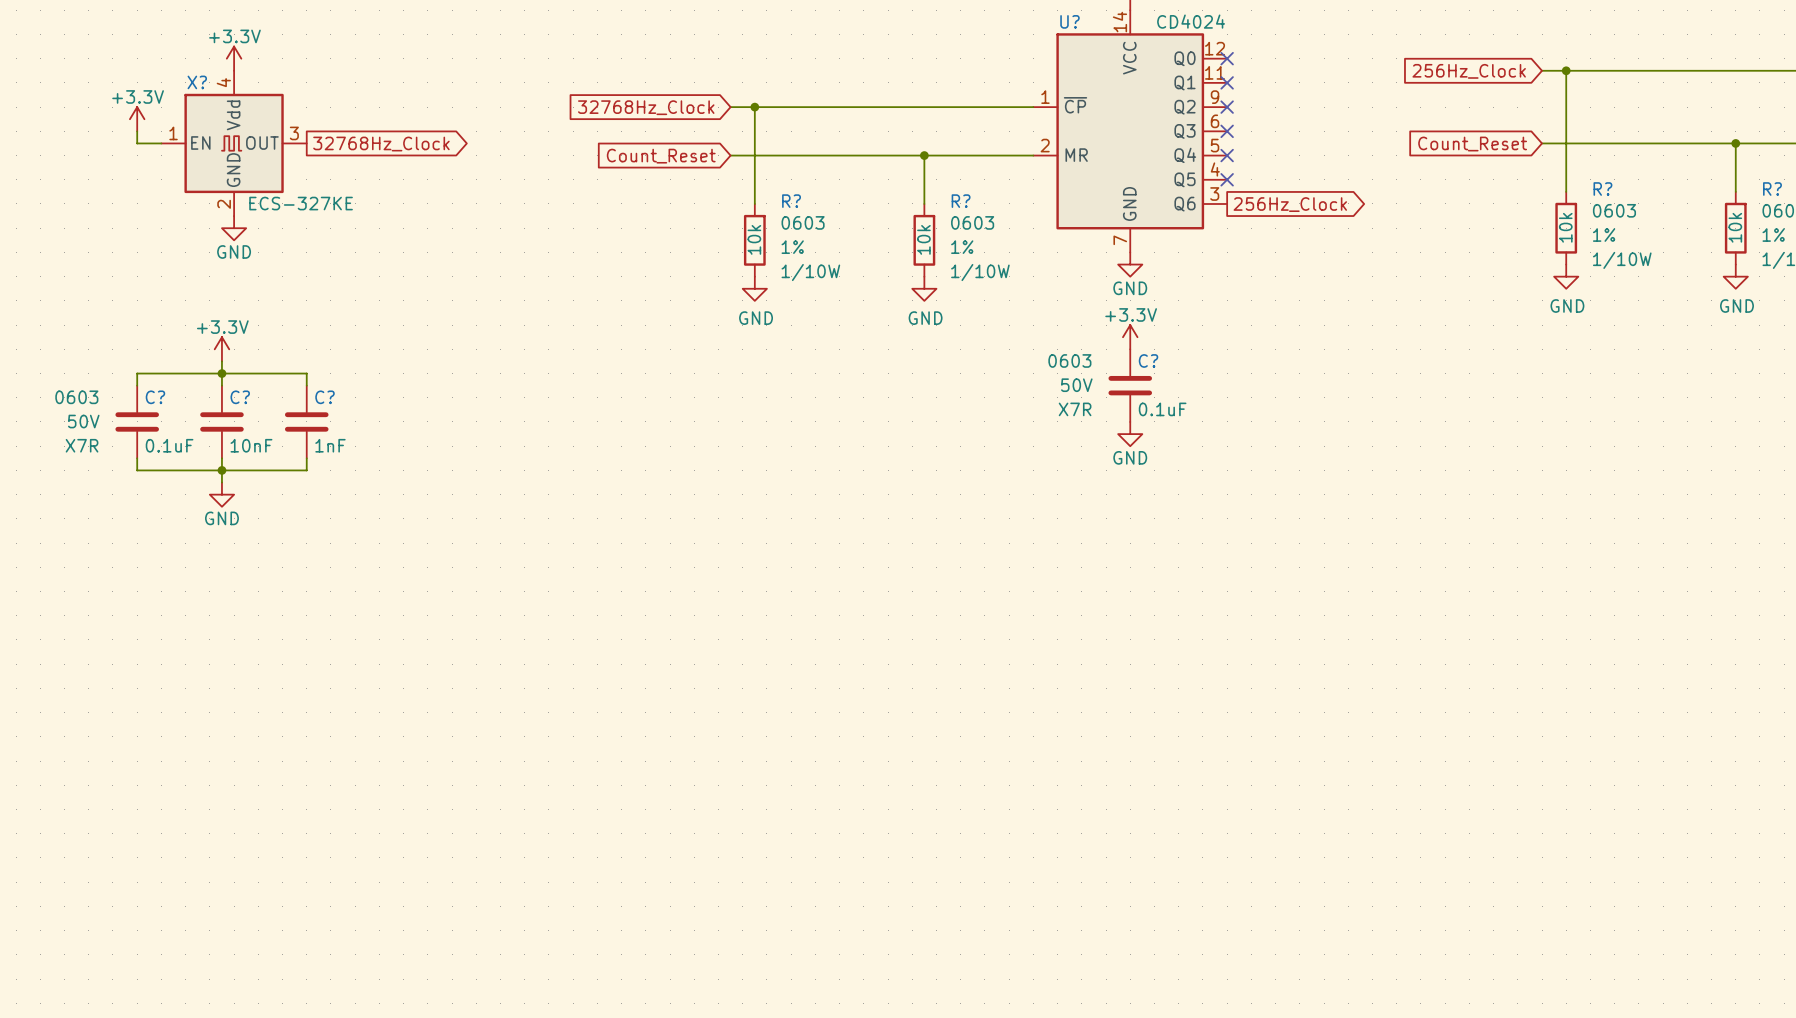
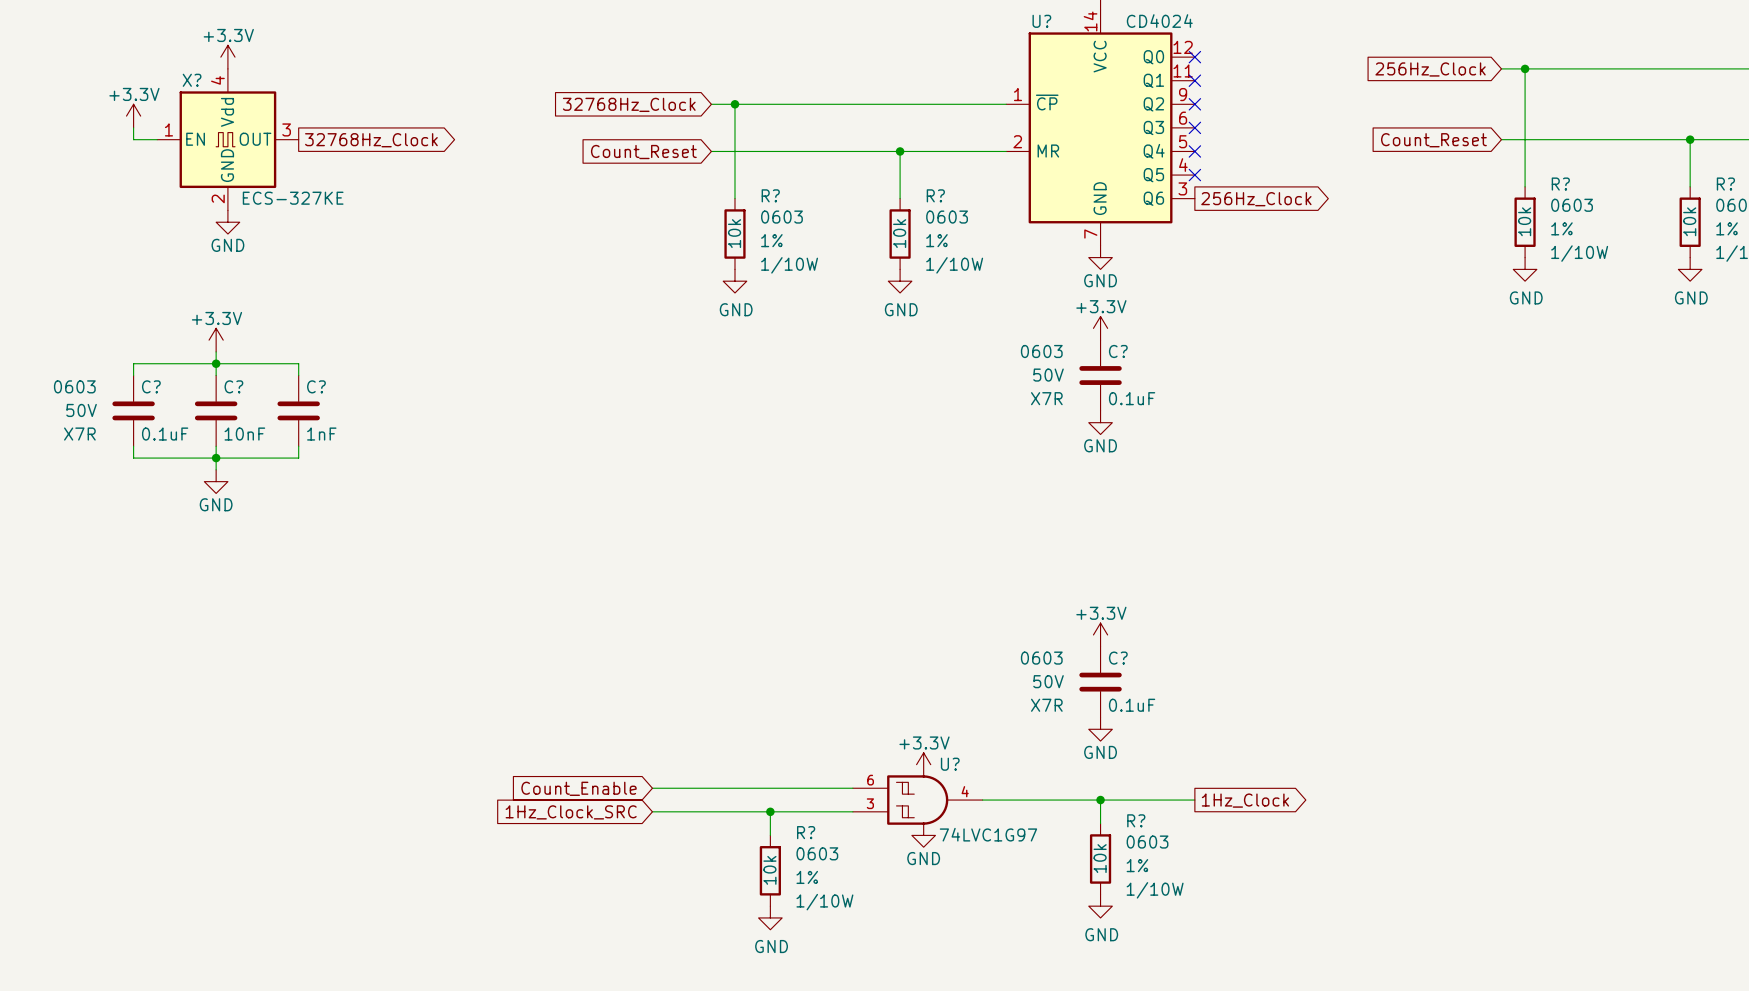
power symbol: none -> +3.3V (1100, 634)
C?: none -> 0.1uF (1100, 682)
power symbol: none -> GND (1100, 729)
power symbol: none -> +3.3V (923, 764)
wire: none -> (652, 788) (852, 788)
global label: none -> Count_Enable (579, 788)
U?: none -> 74LVC1G97 (917, 800)
wire: none -> (982, 800) (1194, 800)
wire: none -> (1100, 800) (1100, 823)
junction: none -> (1100, 800)
global label: none -> 1Hz_Clock (1245, 800)
wire: none -> (652, 811) (852, 811)
wire: none -> (770, 811) (770, 835)
junction: none -> (770, 811)
global label: none -> 1Hz_Clock_SRC (571, 812)
power symbol: none -> GND (923, 835)
R?: none -> 10k (1100, 858)
R?: none -> 10k (770, 870)
power symbol: none -> GND (1100, 906)
power symbol: none -> GND (770, 917)

